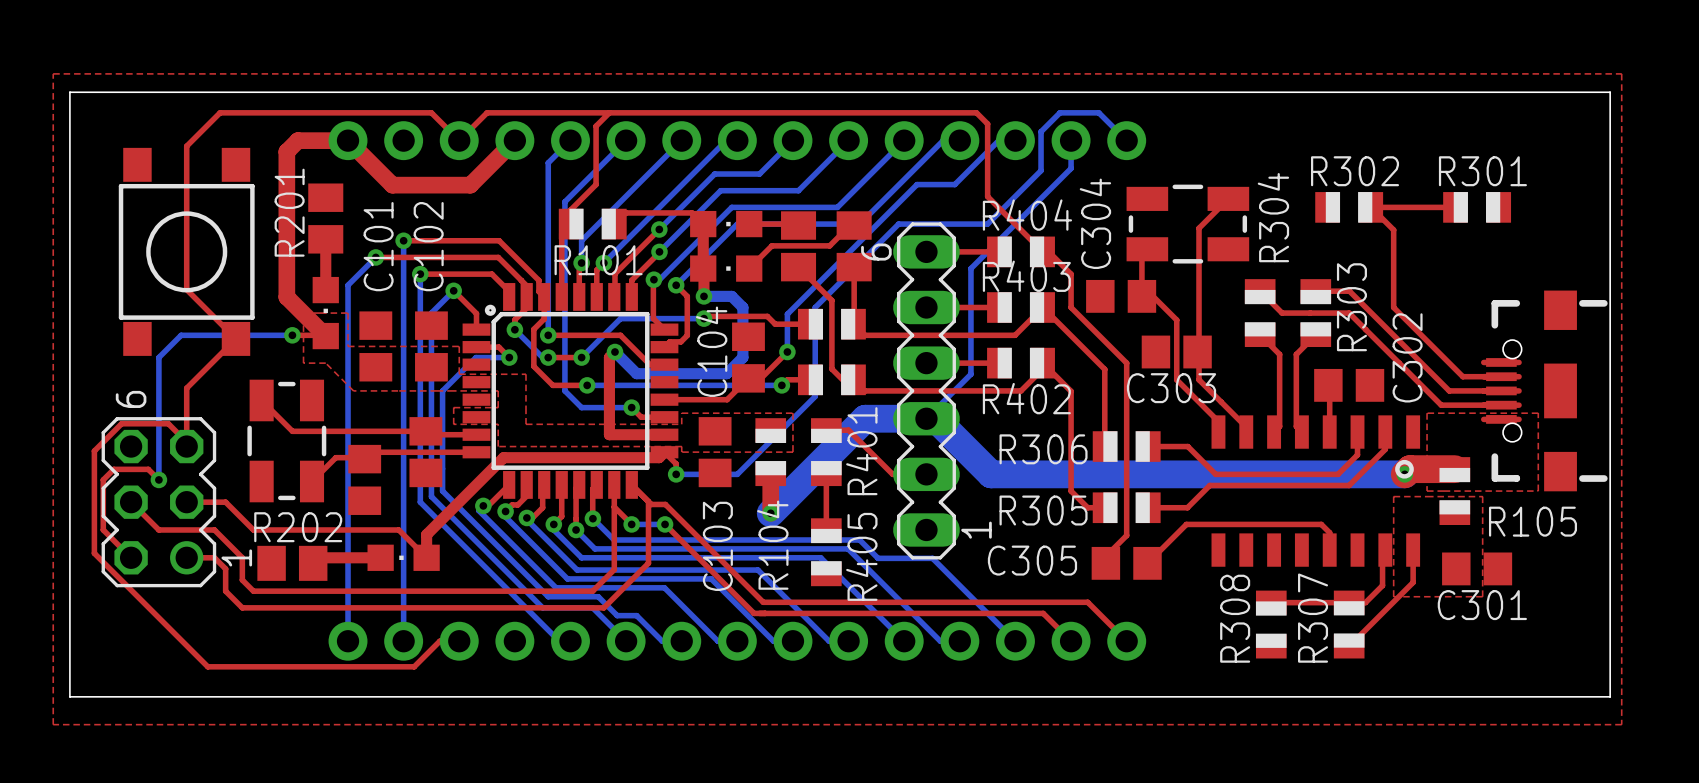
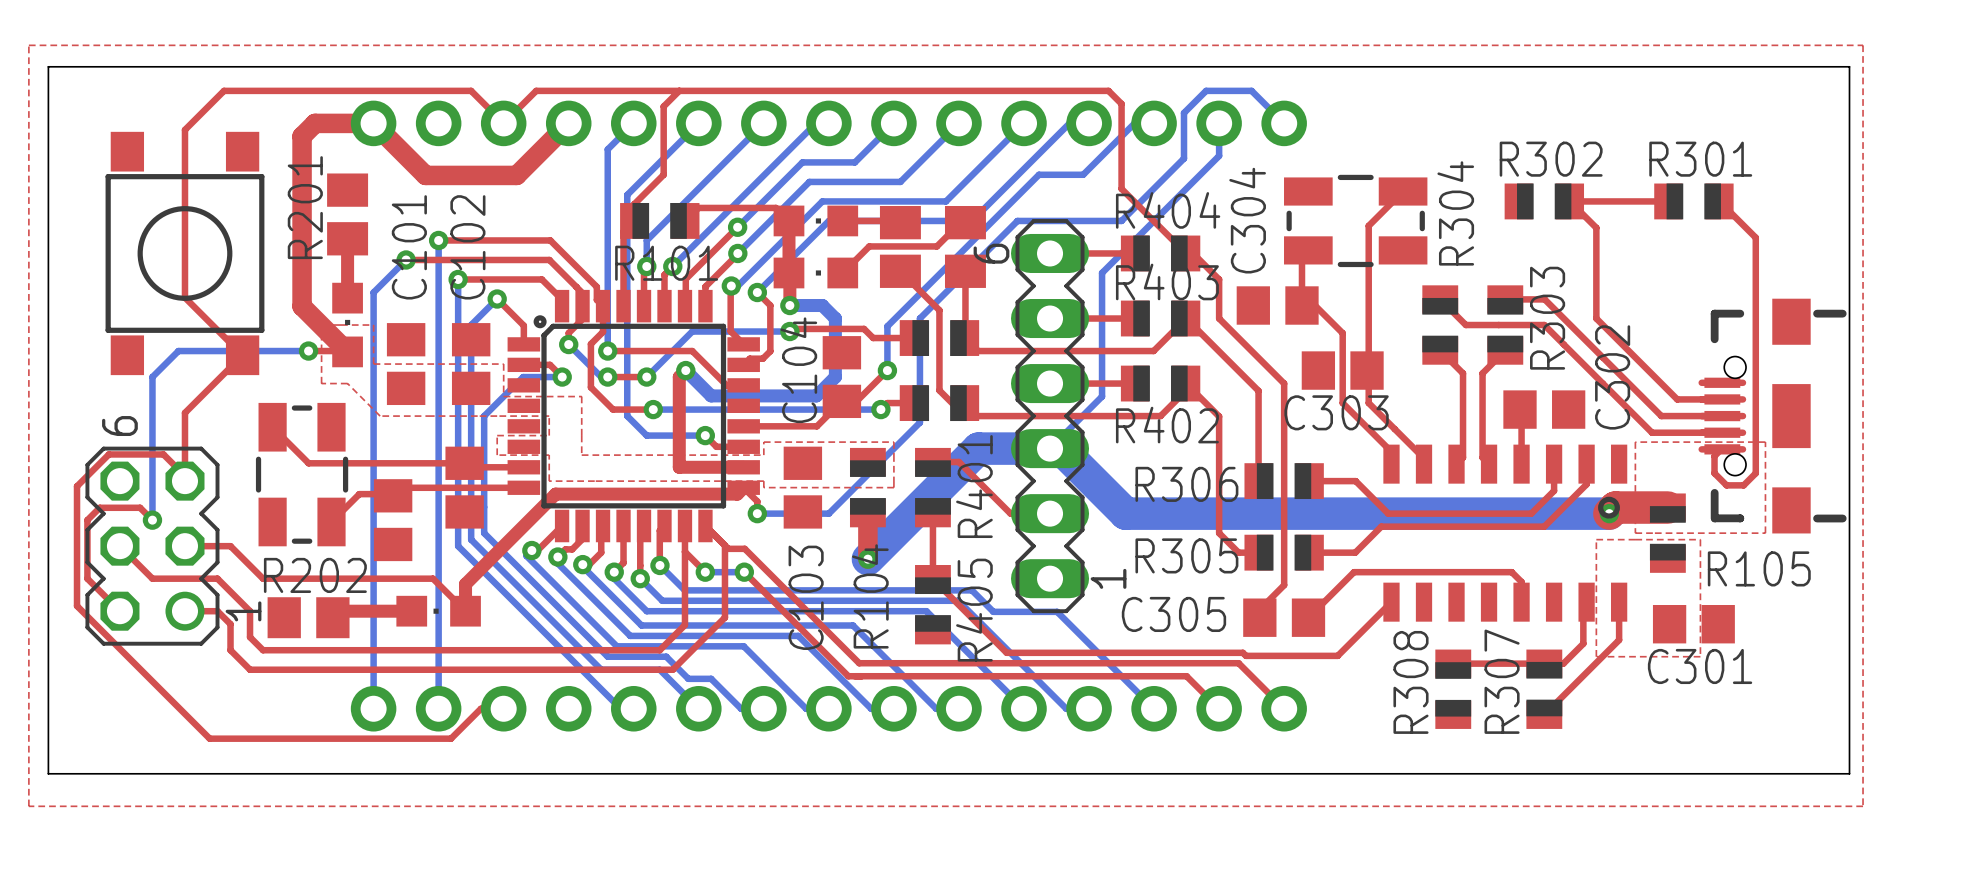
top track: none -> (1719, 201) (1755, 237) (1755, 473) (1743, 485) (1726, 485) (1714, 473) (1714, 456) (1721, 448)
top track: none -> (932, 579) (1006, 652) (1242, 652) (1245, 655) (1337, 655) (1391, 602)

